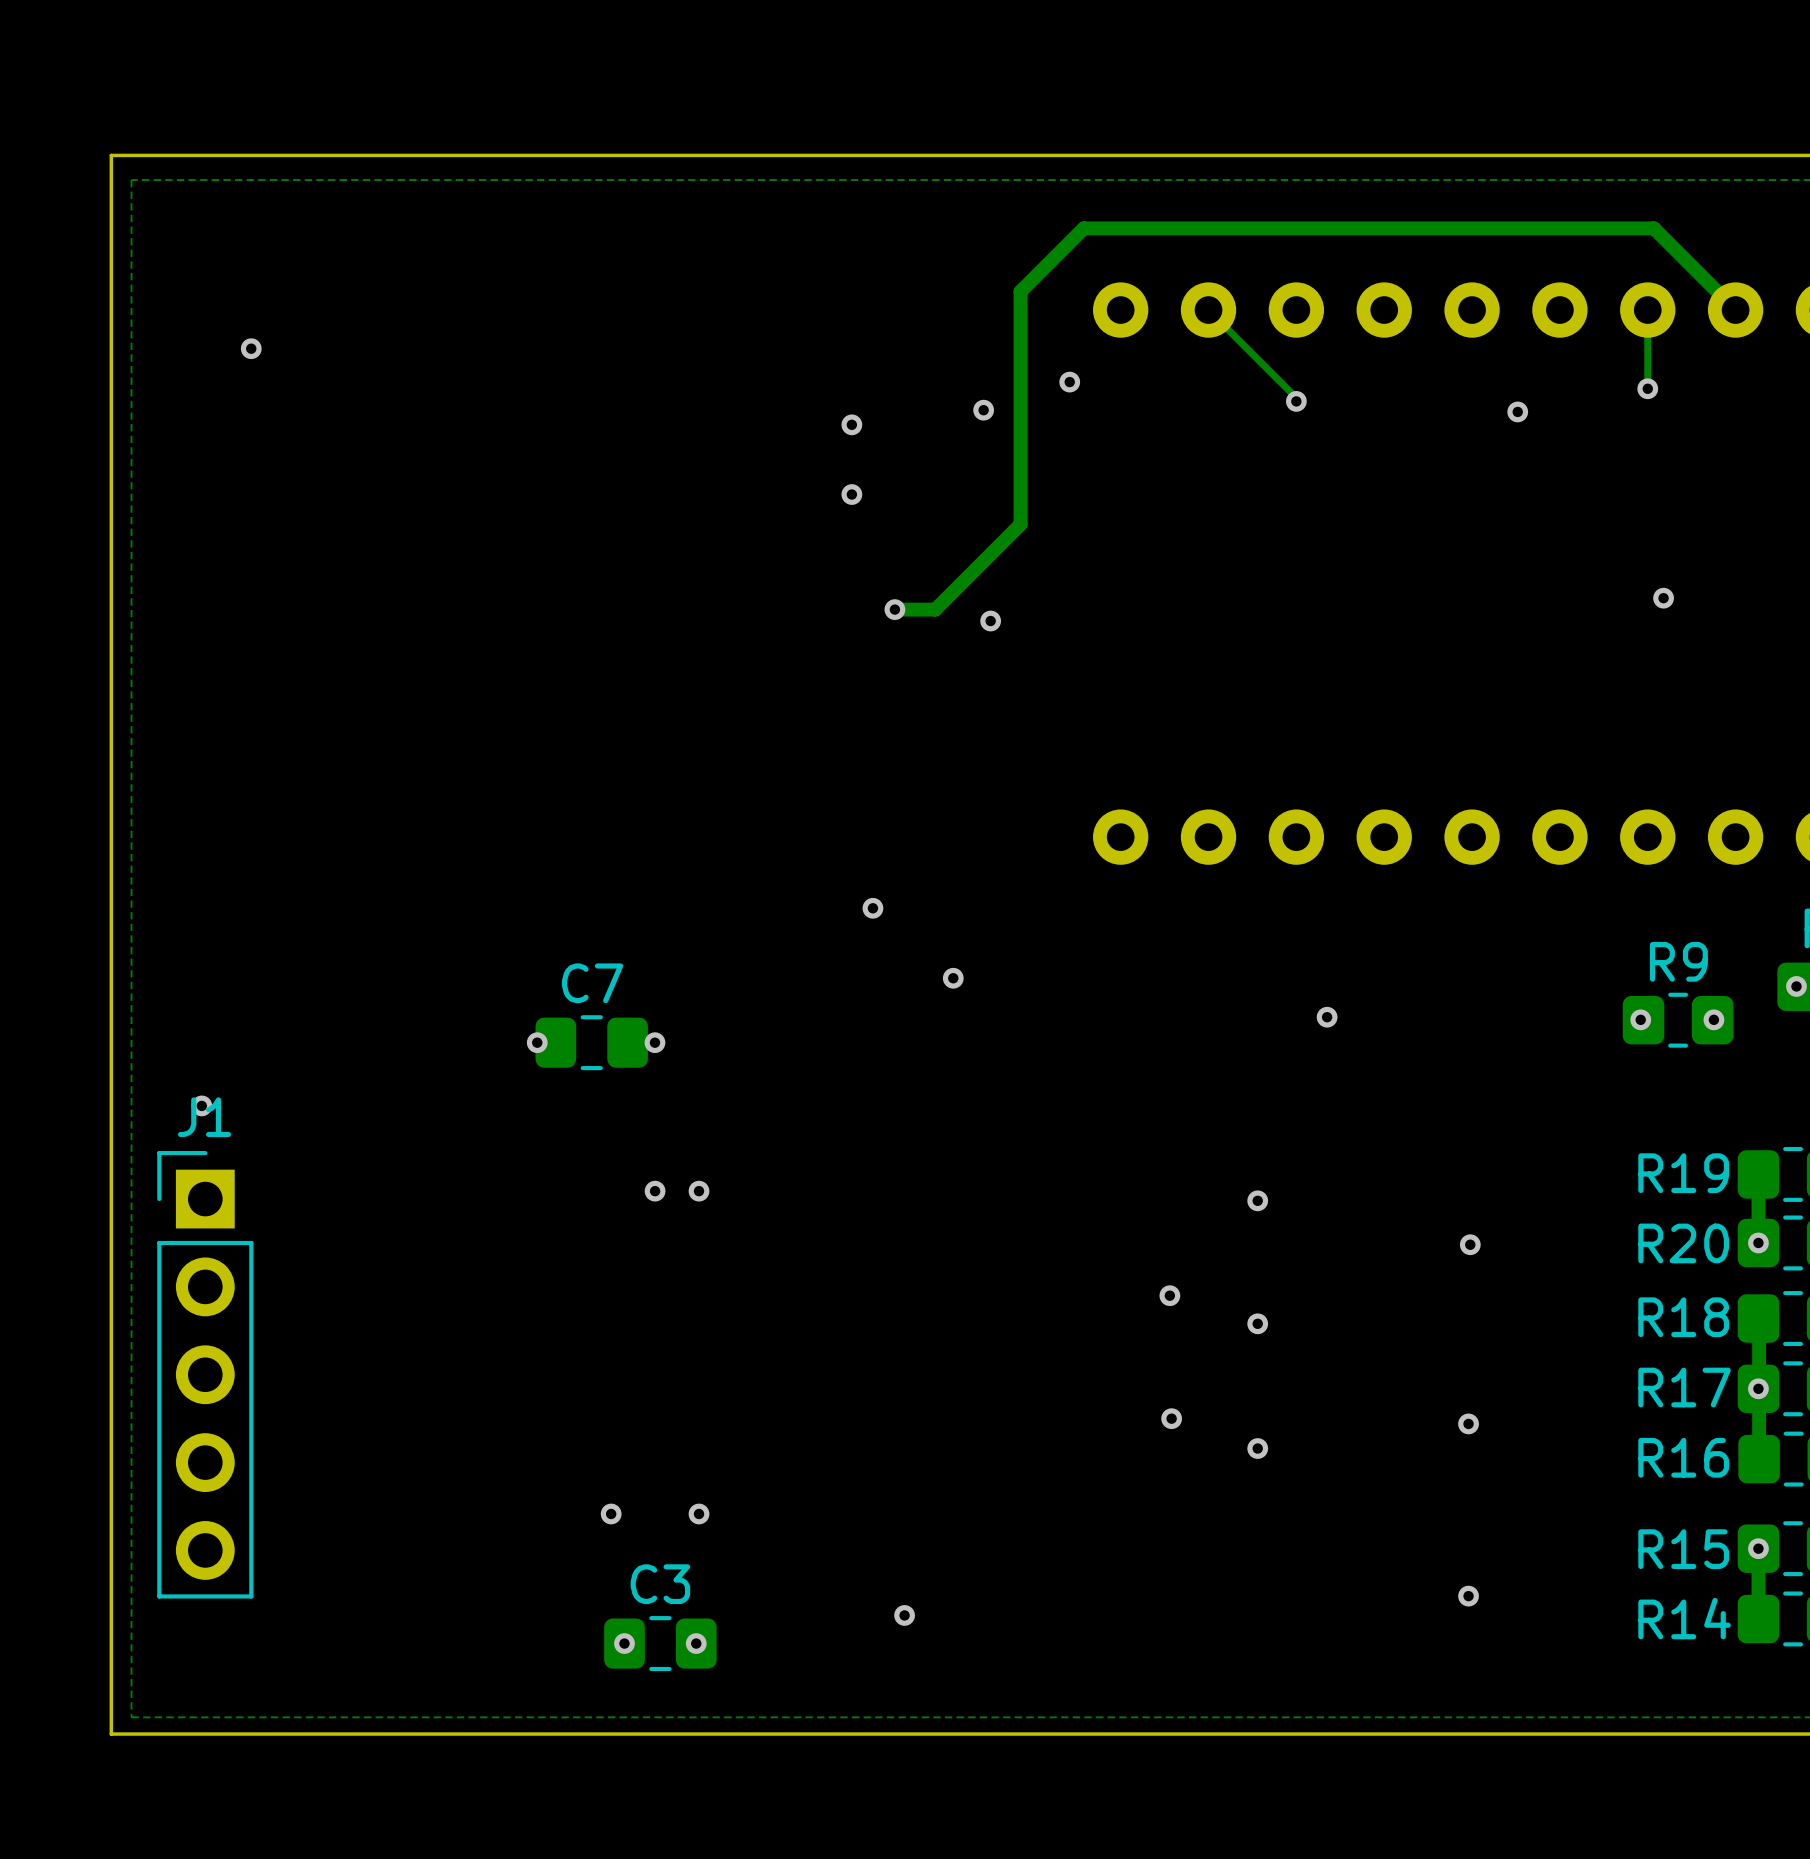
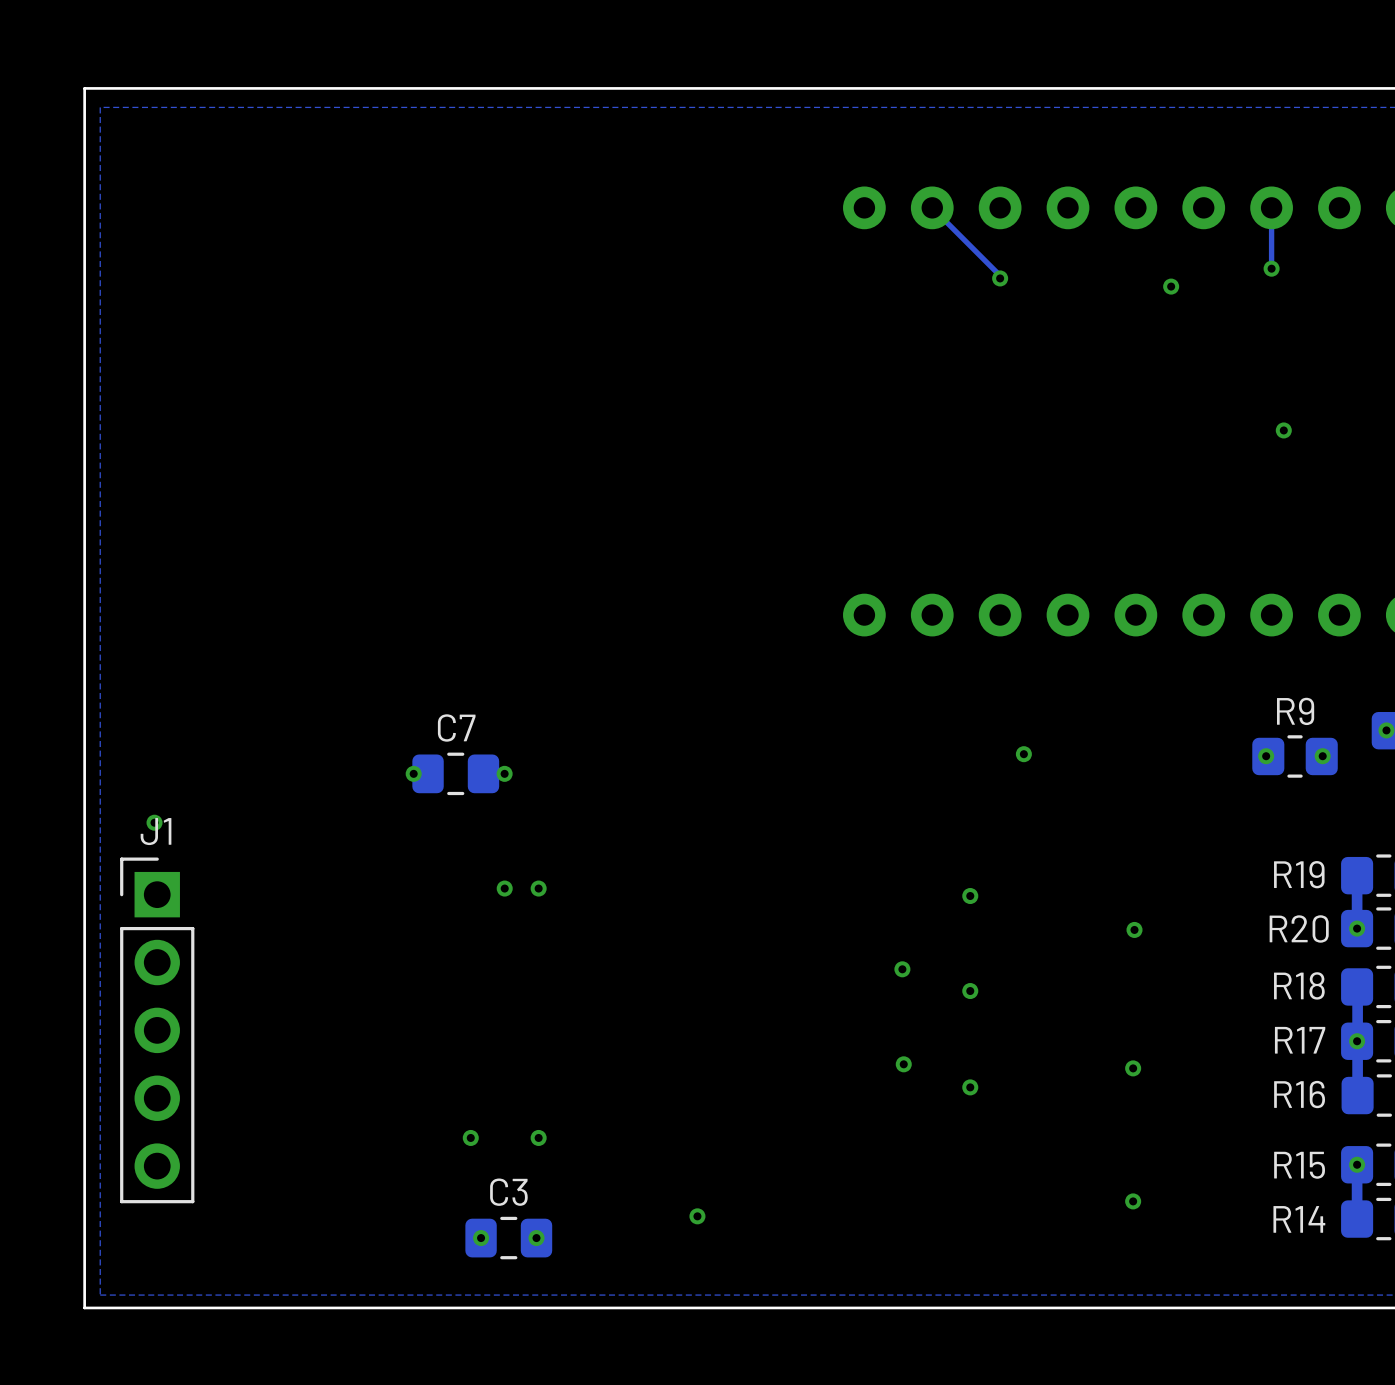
track: (1735, 310) (1653, 228) (1083, 228) (1020, 291) (1020, 524) (935, 609) (894, 609) -> none
via: (251, 348) -> none
via: (1069, 382) -> none
via: (983, 410) -> none
via: (851, 424) -> none
via: (851, 494) -> none
via: (894, 609) -> none
via: (990, 621) -> none
via: (872, 908) -> none
via: (953, 978) -> none

